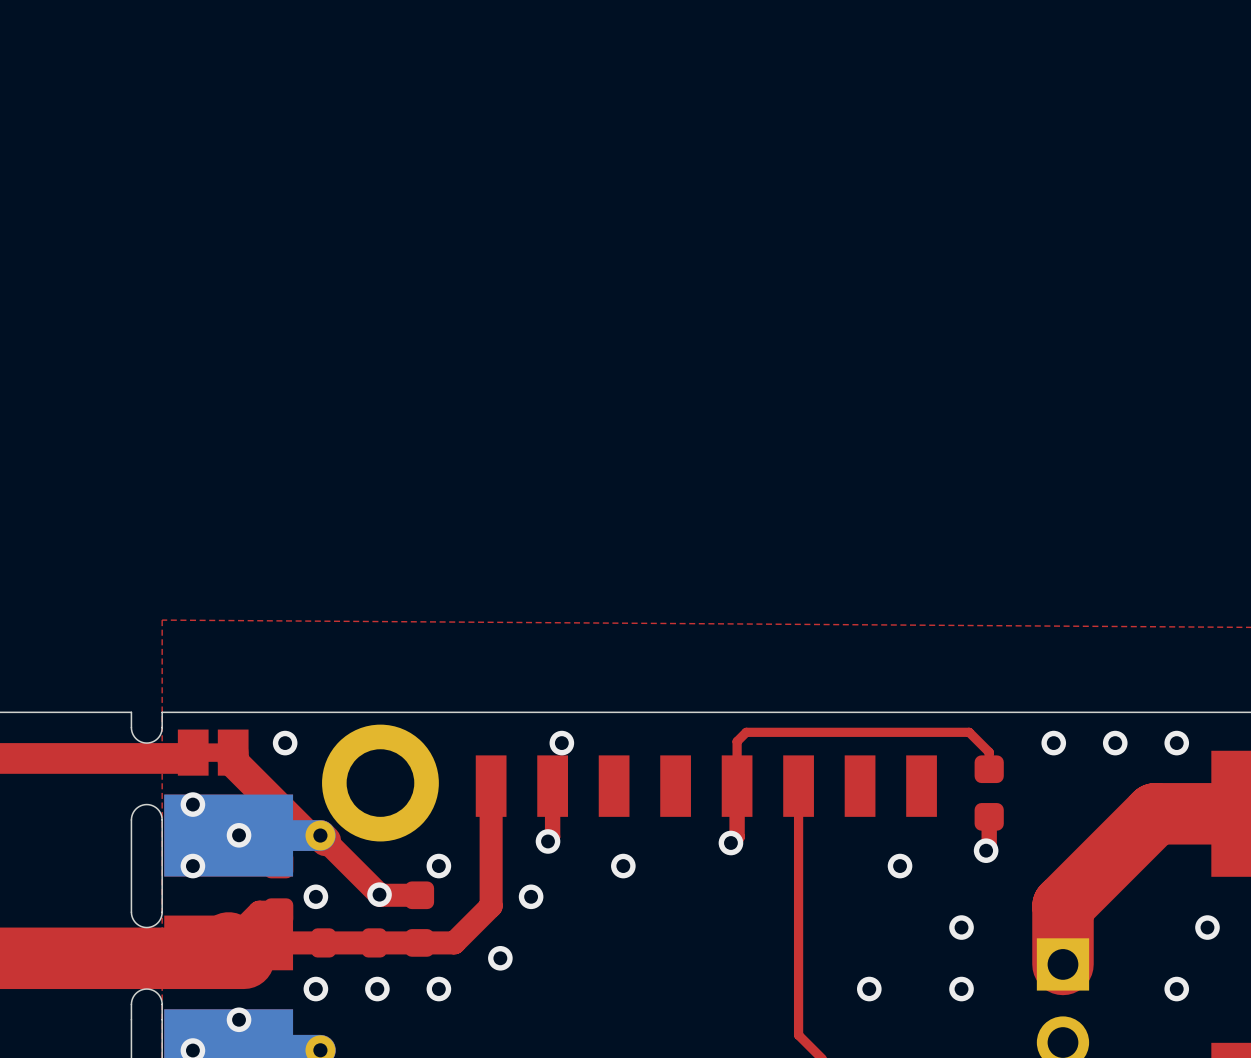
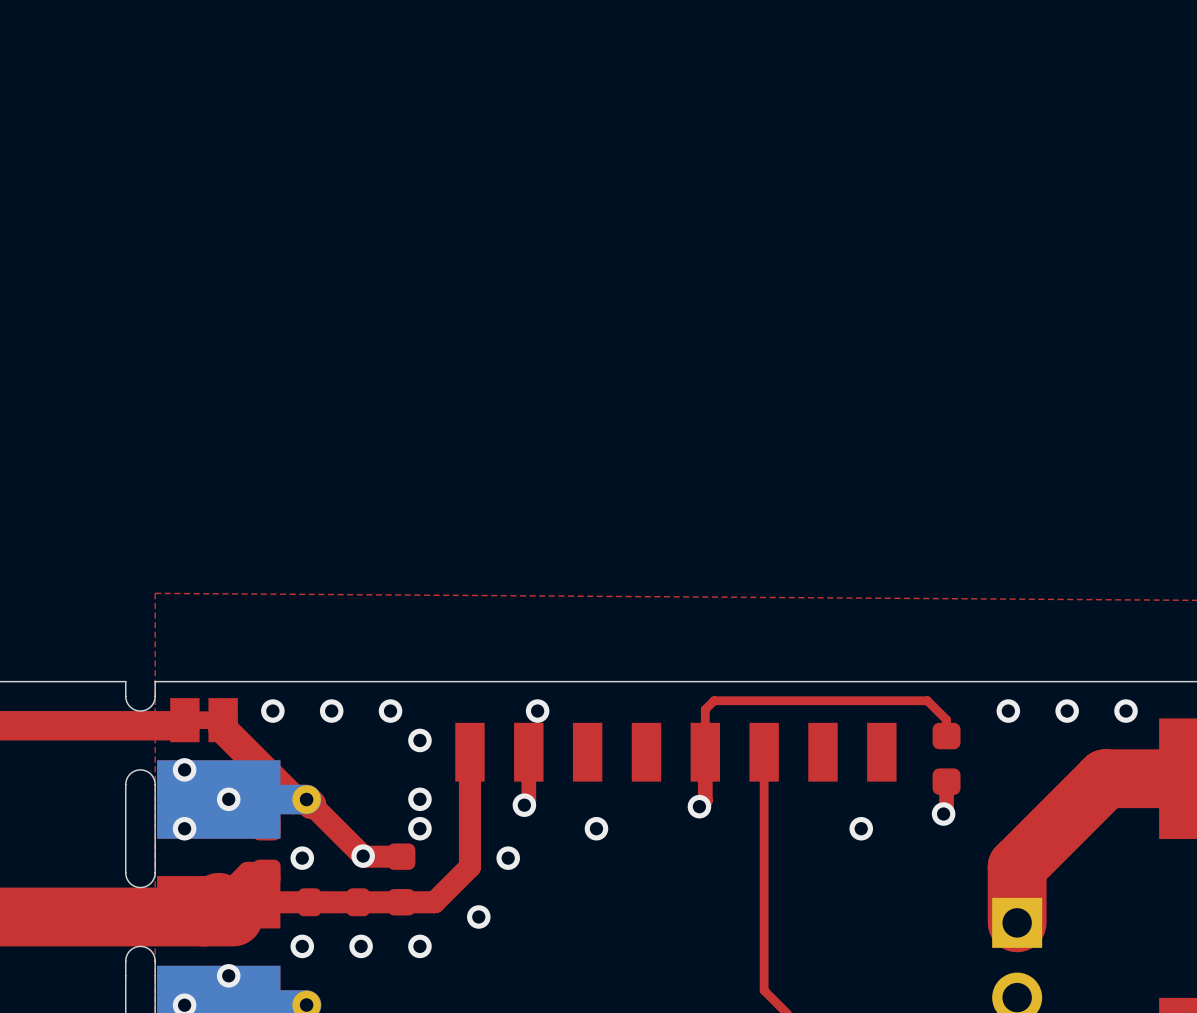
via: none -> (331, 711)
via: none -> (390, 711)
via: none -> (419, 740)
part: (380, 783) -> none
via: none -> (419, 799)
via: (961, 927) -> none
via: (1207, 927) -> none
via: (869, 989) -> none
via: (961, 989) -> none
via: (1176, 989) -> none

